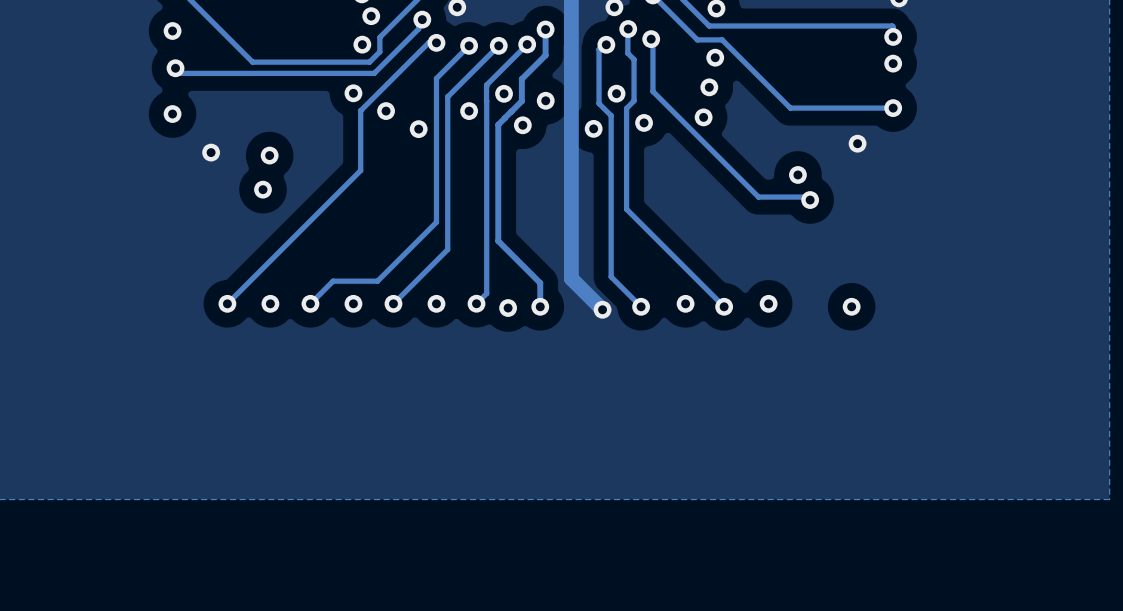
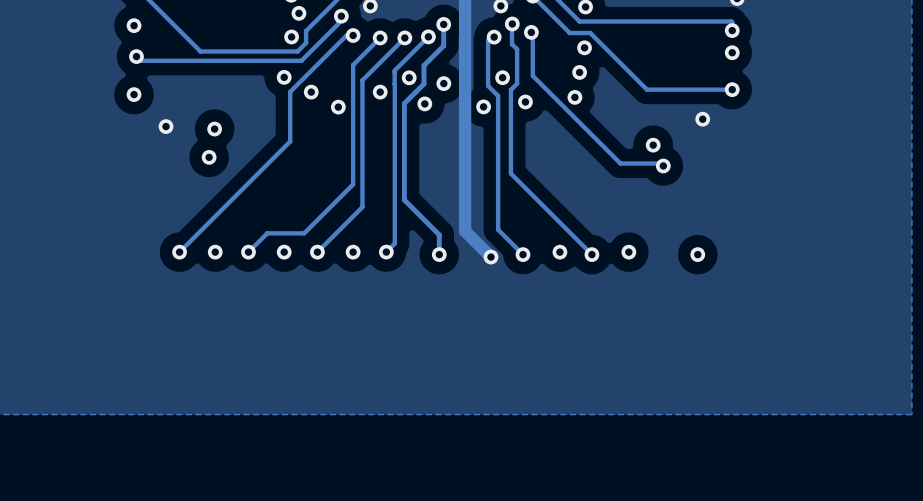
via: (508, 308) -> none

